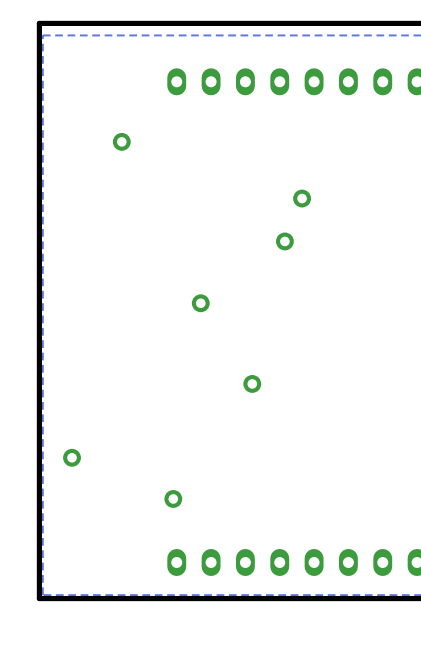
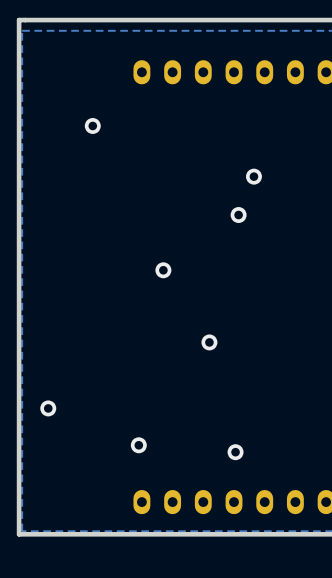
via: none -> (235, 452)

